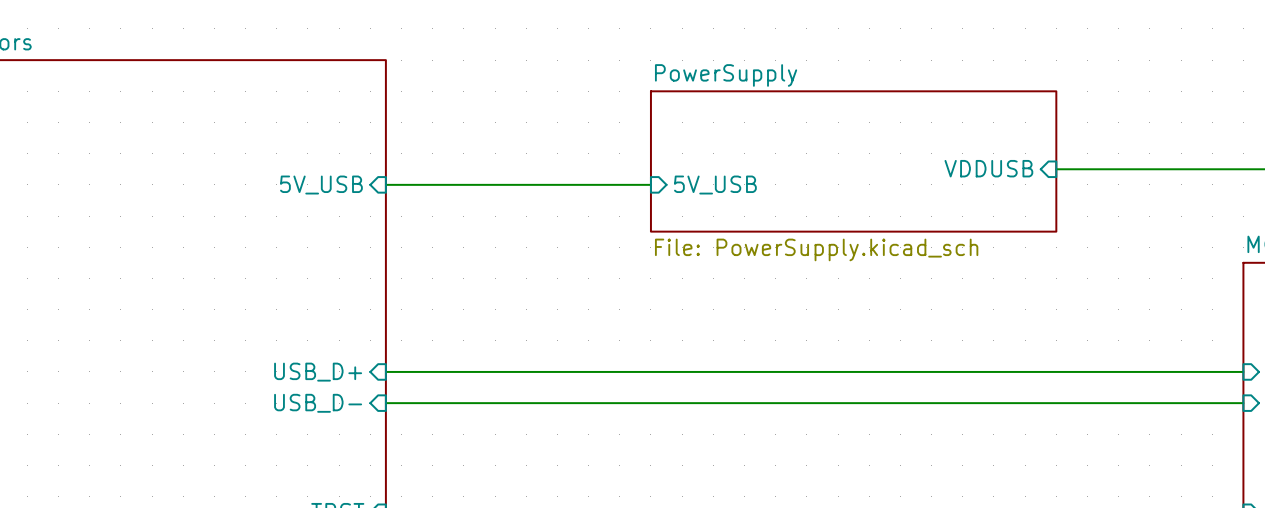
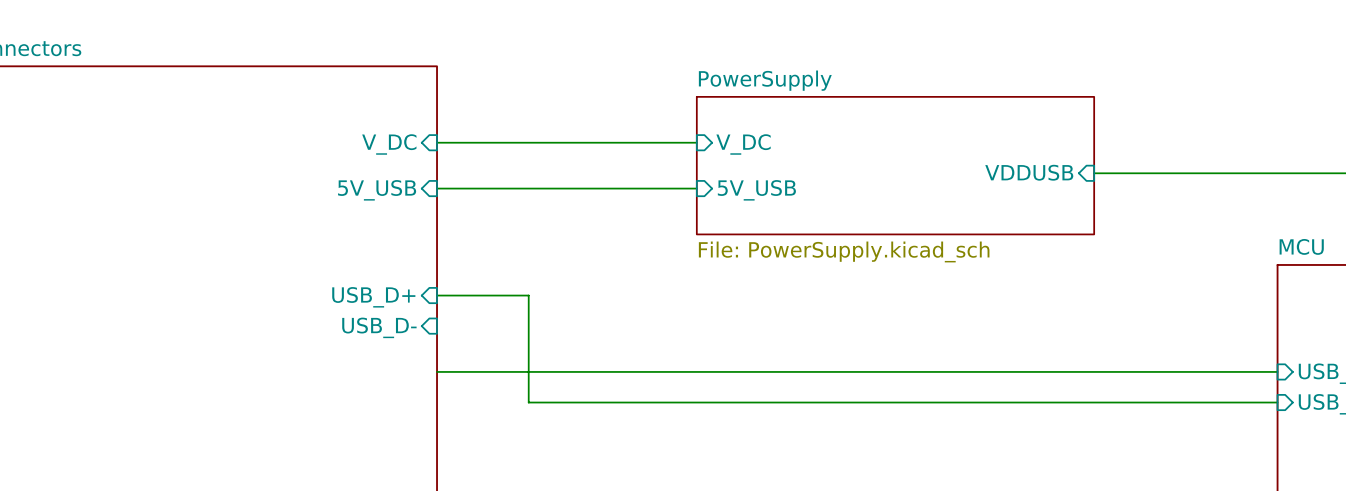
sheet pin: none -> V_DC (389, 144)
wire: none -> (437, 142) (696, 142)
sheet pin: none -> V_DC (743, 144)
sheet pin position: USB_D+ (318, 372) -> USB_D+ (373, 297)
sheet pin position: USB_D- (318, 403) -> USB_D- (379, 327)
wire: (385, 403) (479, 403) -> (437, 295) (528, 295) (528, 402)

